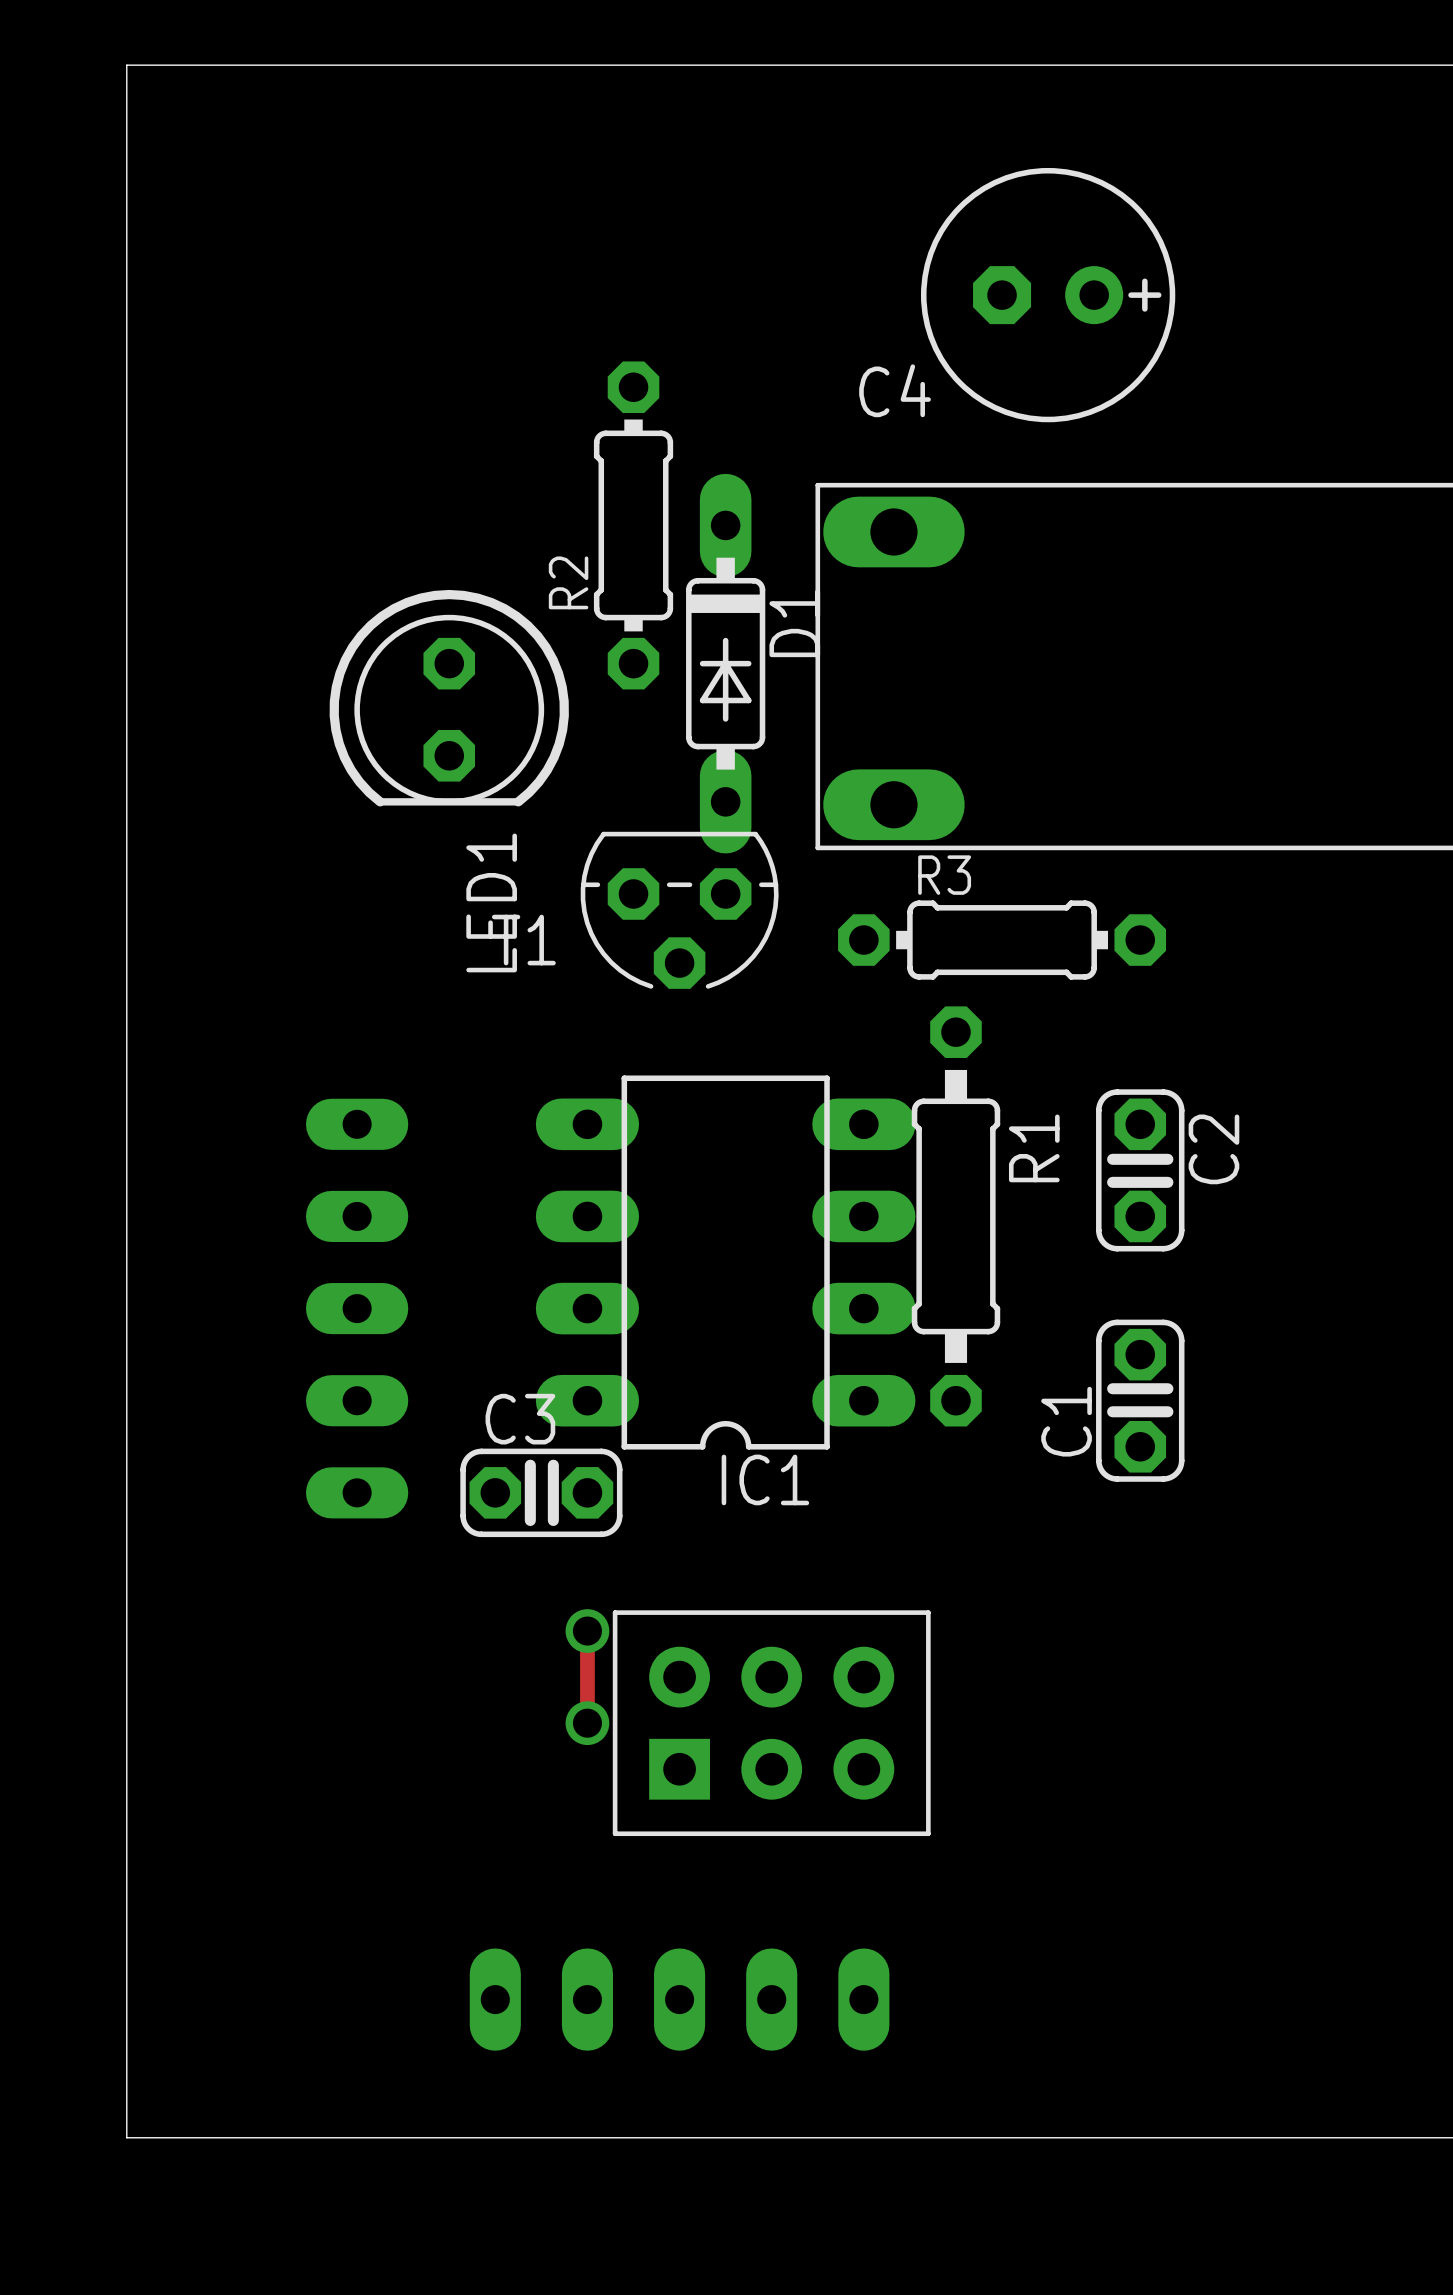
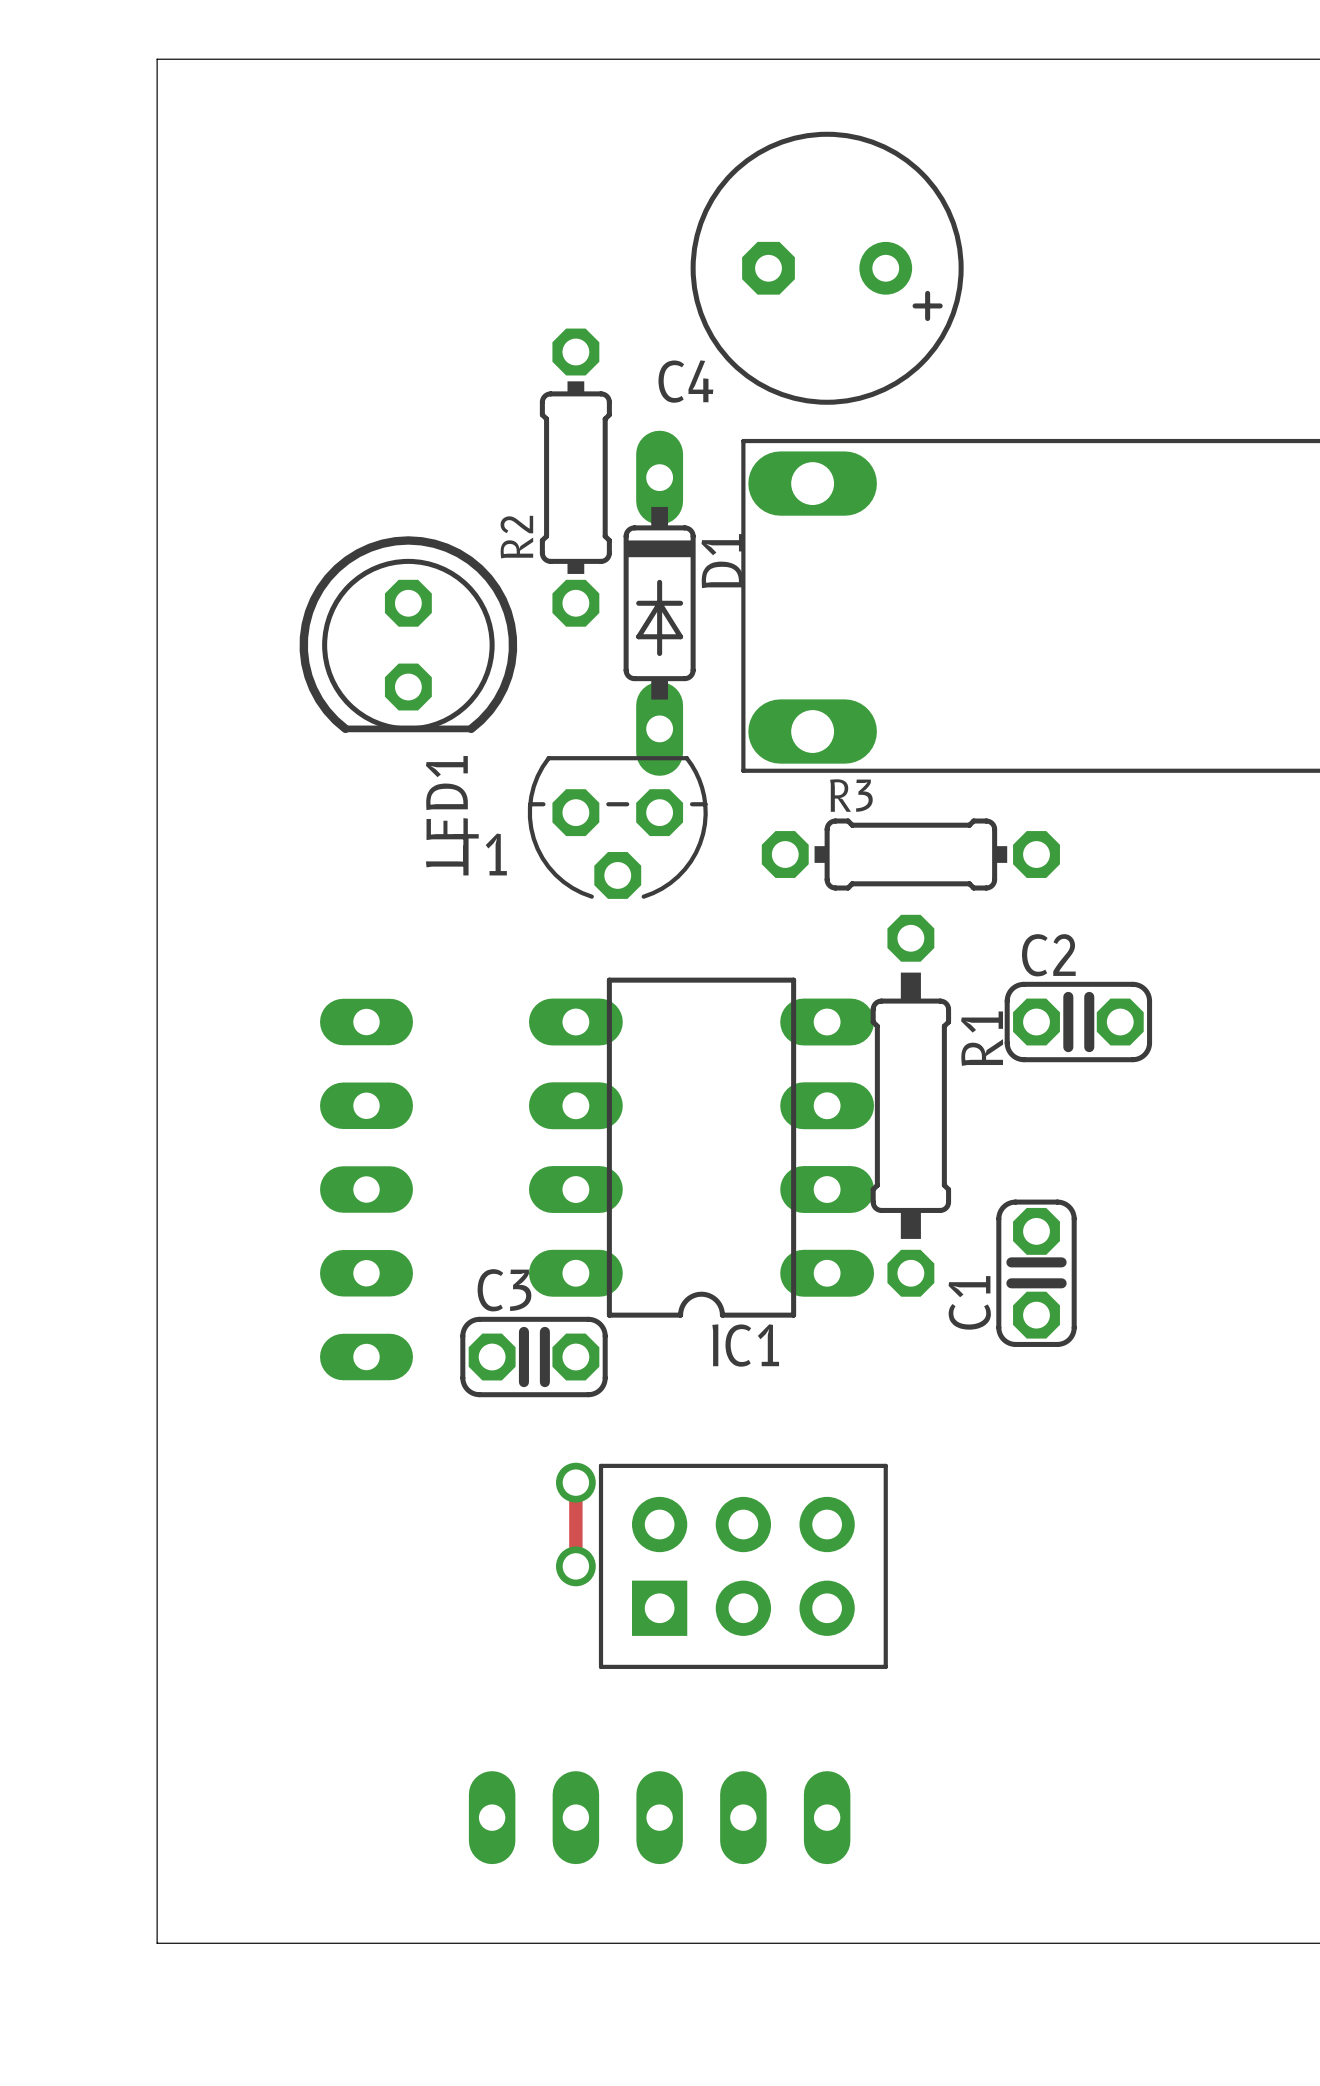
board edge: (172, 65) (126, 65) (126, 2137) (172, 2137) -> (157, 59) (157, 1943)
C4 footprint: [920, 167, 1176, 423] -> [690, 131, 964, 405]
C2 rotation: 0° (1140, 1170) -> 90° counterclockwise (1078, 1022)
R1 position: (955, 1216) -> (910, 1105)
IC1 position: (725, 1262) -> (701, 1147)
part position: (357, 1308) -> (366, 1189)
C3 position: (541, 1492) -> (534, 1357)
track: (587, 1631) (587, 1723) -> (575, 1482) (575, 1566)
via position: (587, 1631) -> (575, 1482)
via position: (587, 1723) -> (575, 1566)
part position: (771, 1723) -> (743, 1566)
part position: (679, 1999) -> (659, 1817)

